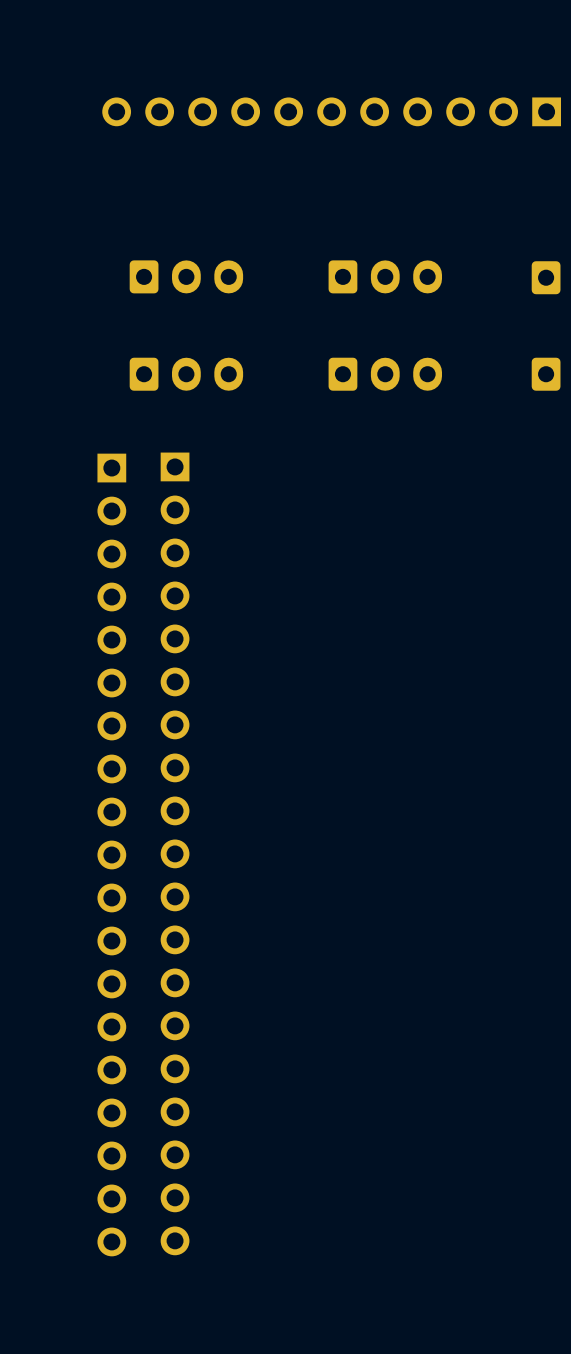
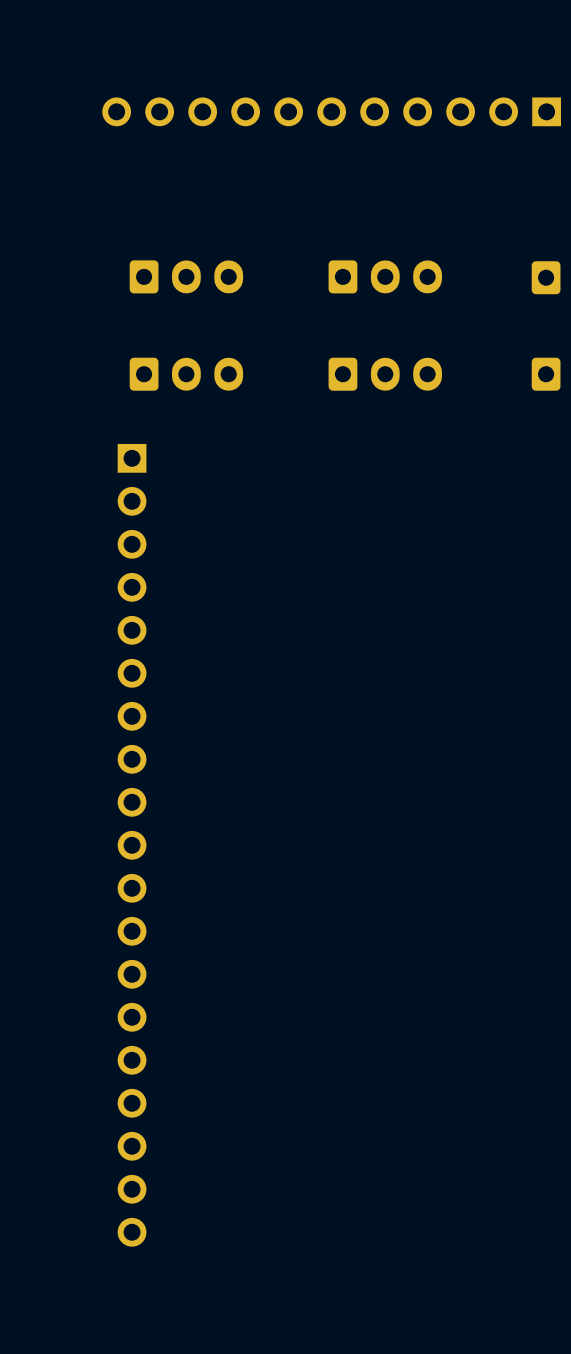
part: none -> (132, 845)
part: (175, 853) -> none
part: (111, 854) -> none

